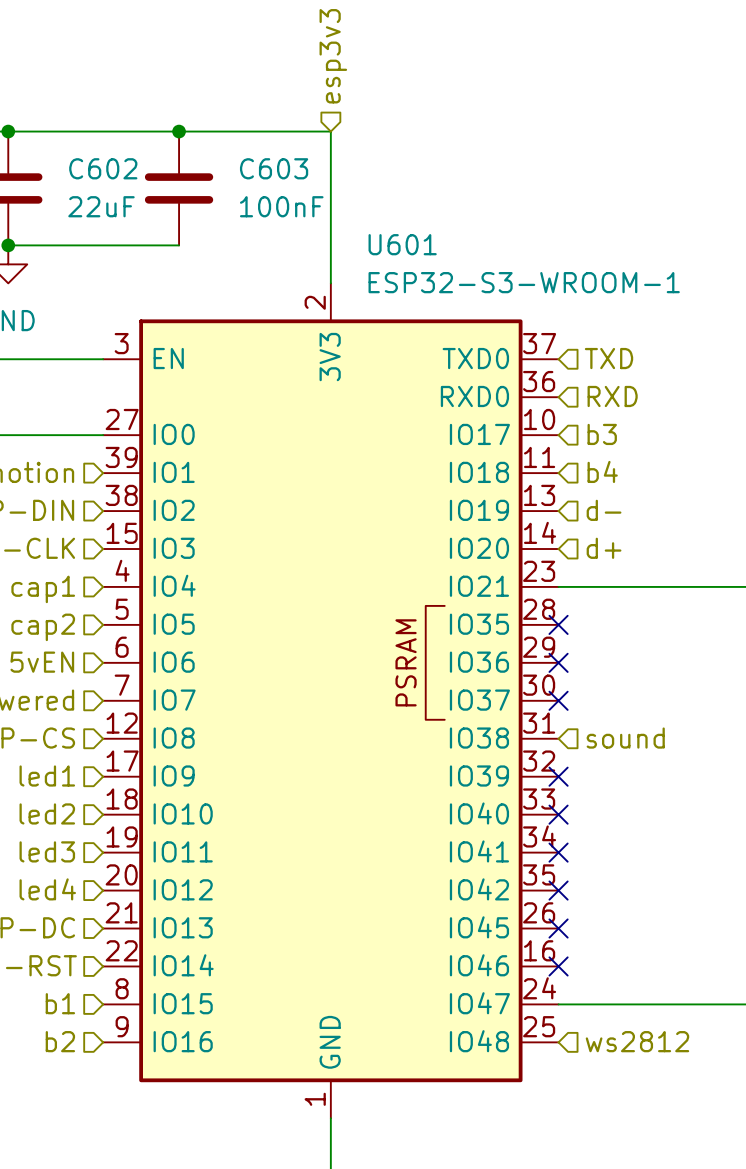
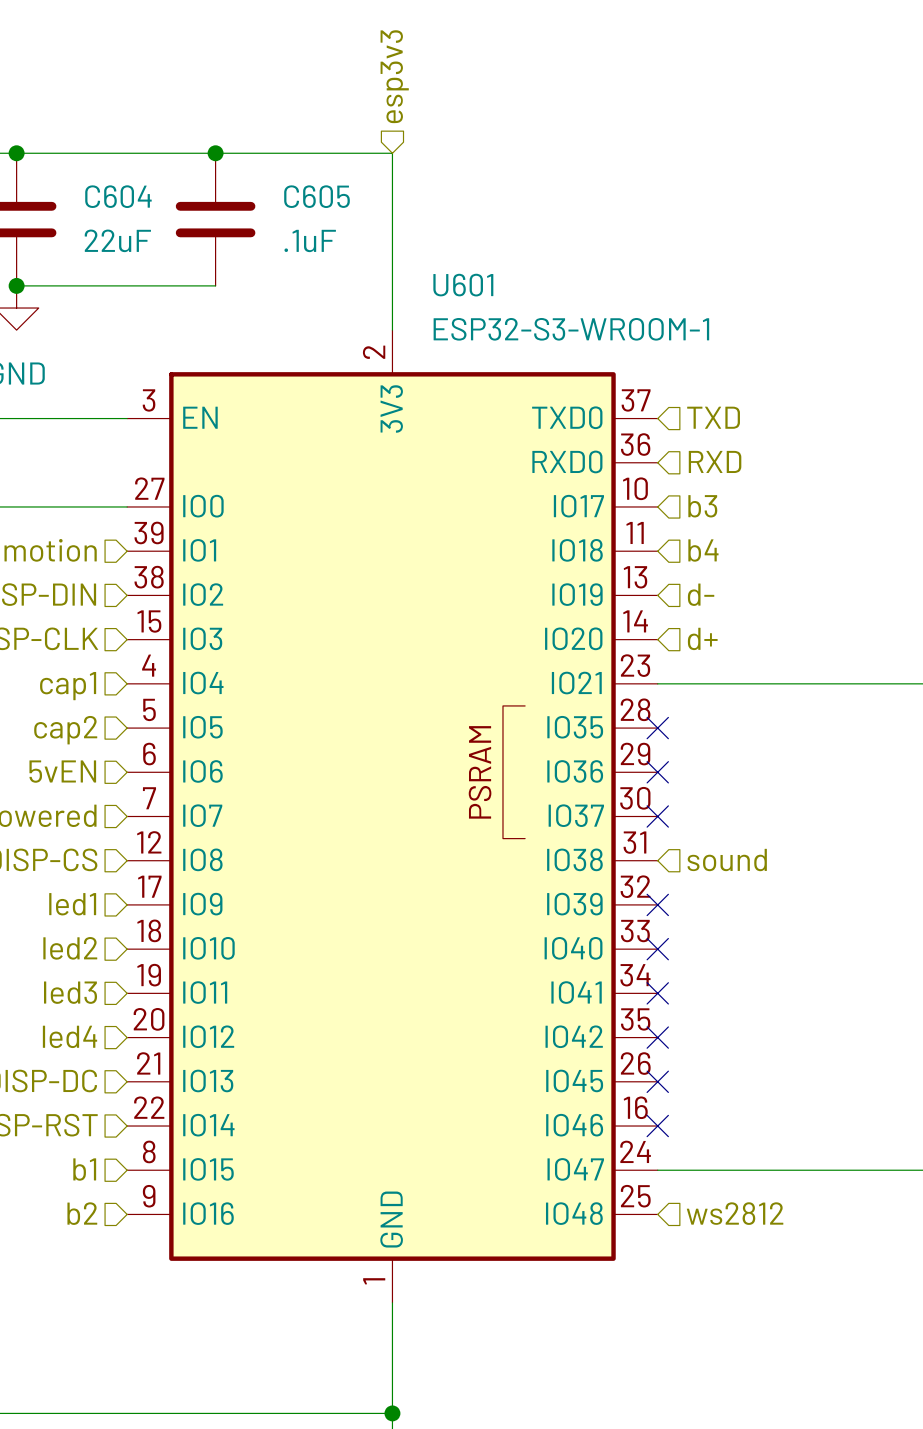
C602 name: C602 (103, 168) -> C604 (118, 196)
C603 name: C603 (274, 168) -> C605 (317, 196)
C603 value: 100nF (281, 206) -> .1uF (310, 240)

